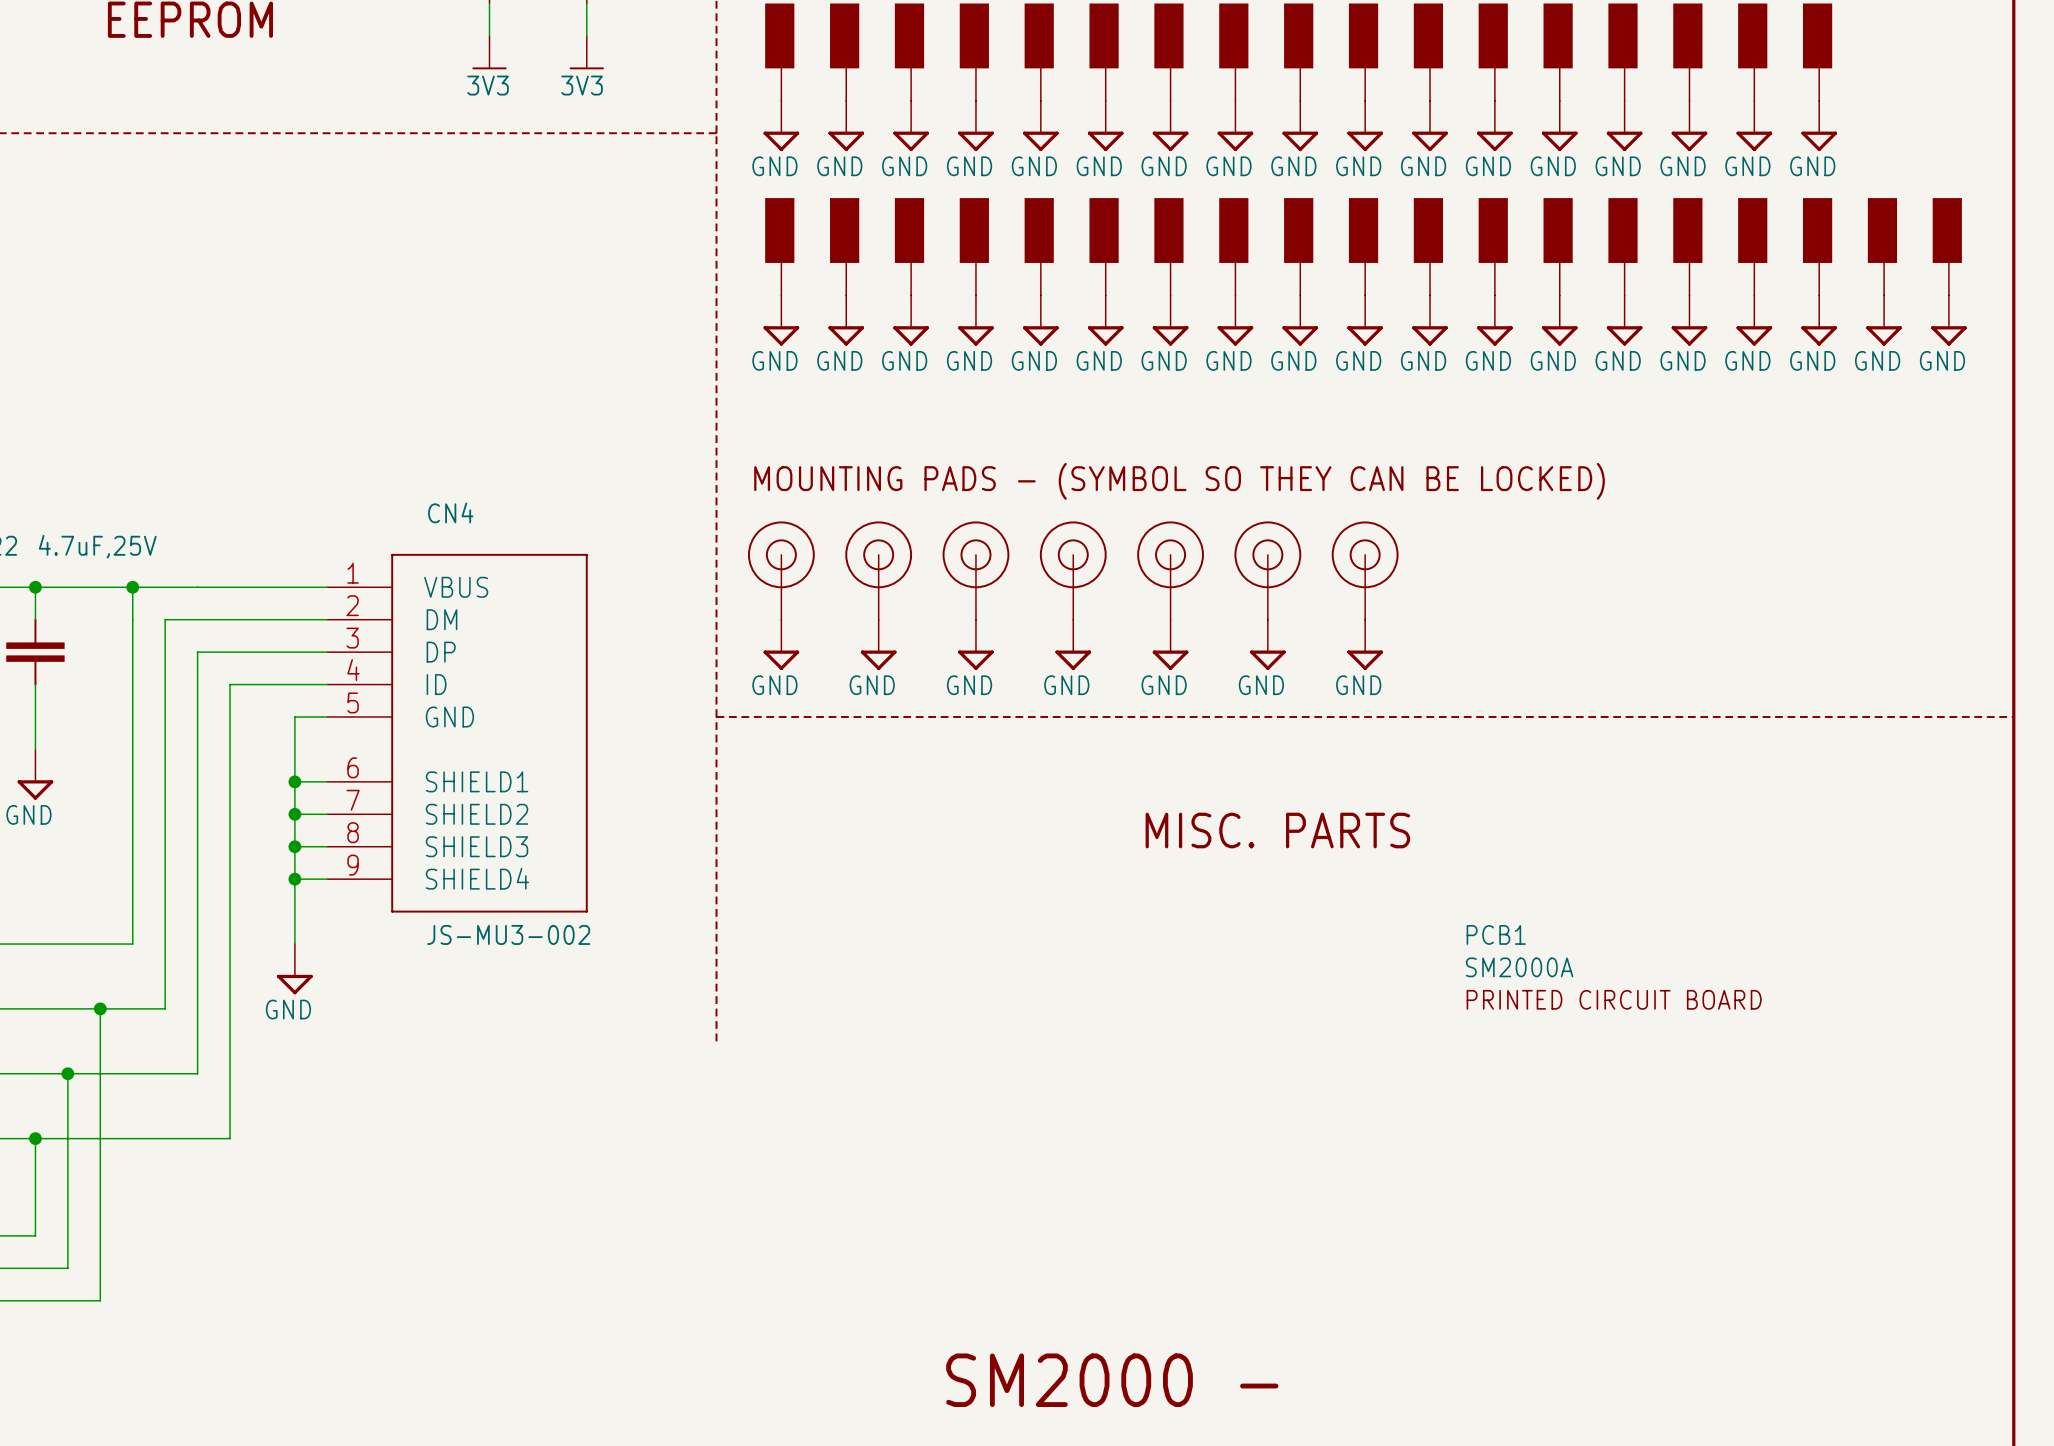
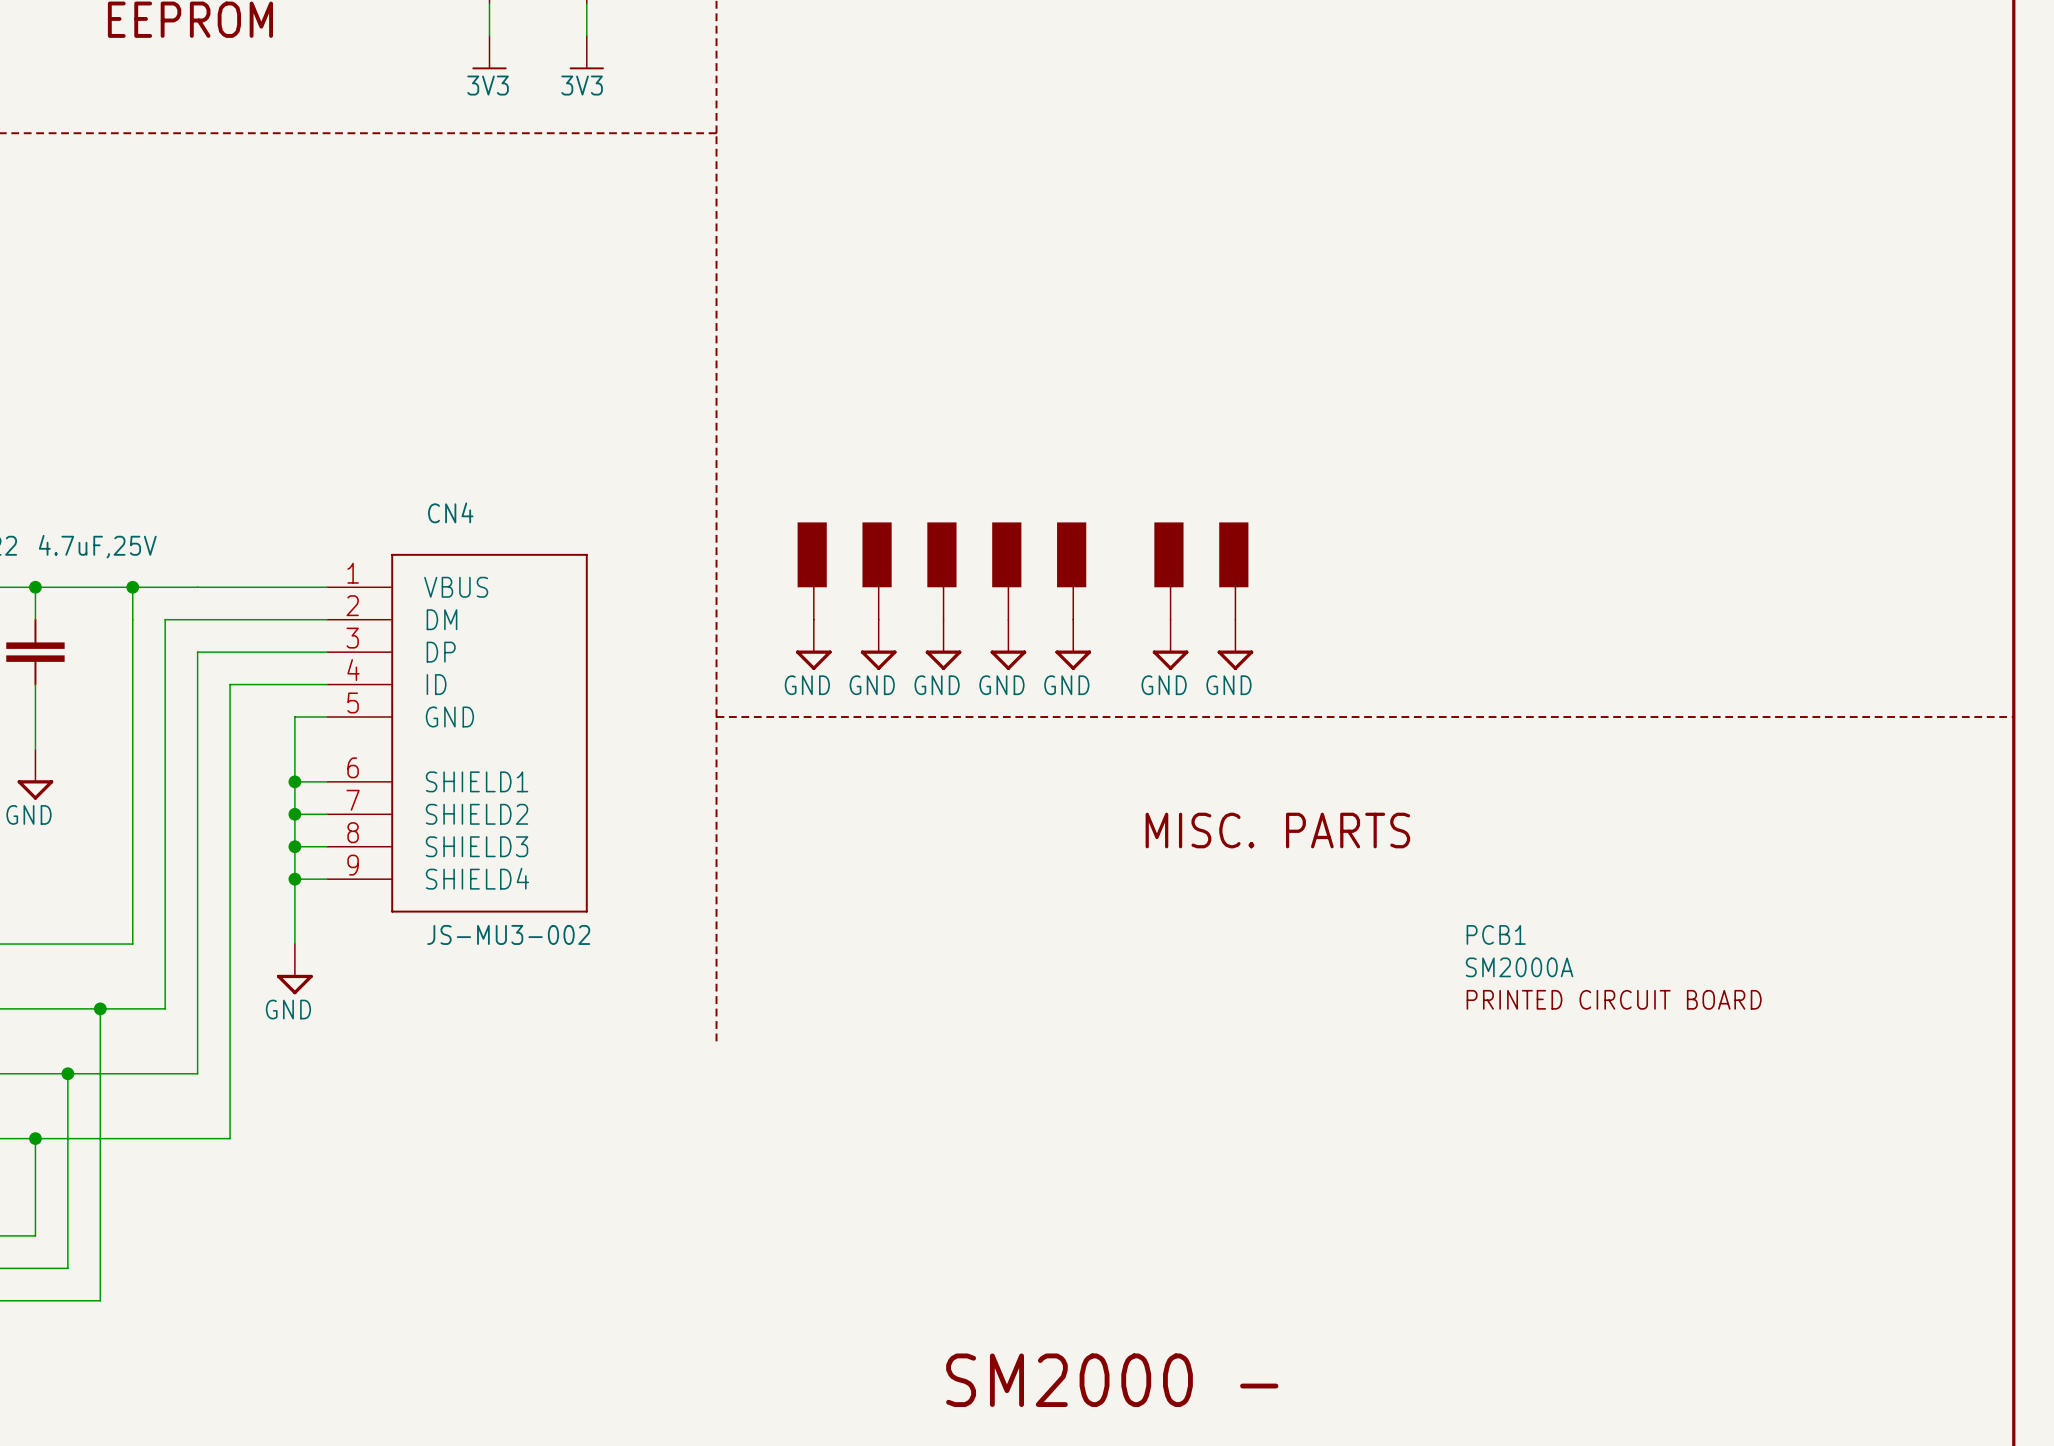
part: (779, 52) -> none
part: (844, 52) -> none
part: (909, 52) -> none
part: (974, 52) -> none
part: (1039, 52) -> none
part: (1104, 52) -> none
part: (1168, 52) -> none
part: (1233, 52) -> none
part: (1298, 52) -> none
part: (1363, 52) -> none
part: (1428, 52) -> none
part: (1493, 52) -> none
part: (1558, 52) -> none
part: (1622, 52) -> none
part: (1687, 52) -> none
part: (1752, 52) -> none
part: (1817, 52) -> none
power symbol: GND (781, 125) -> none
power symbol: GND (846, 125) -> none
power symbol: GND (911, 125) -> none
power symbol: GND (975, 125) -> none
power symbol: GND (1040, 125) -> none
power symbol: GND (1105, 125) -> none
power symbol: GND (1170, 125) -> none
power symbol: GND (1235, 125) -> none
power symbol: GND (1300, 125) -> none
power symbol: GND (1365, 125) -> none
power symbol: GND (1430, 125) -> none
power symbol: GND (1494, 125) -> none
power symbol: GND (1559, 125) -> none
power symbol: GND (1624, 125) -> none
power symbol: GND (1689, 125) -> none
power symbol: GND (1754, 125) -> none
power symbol: GND (1819, 125) -> none
part: (779, 246) -> none
part: (844, 246) -> none
part: (909, 246) -> none
part: (974, 246) -> none
part: (1039, 246) -> none
part: (1104, 246) -> none
part: (1168, 246) -> none
part: (1233, 246) -> none
part: (1298, 246) -> none
part: (1363, 246) -> none
part: (1428, 246) -> none
part: (1493, 246) -> none
part: (1558, 246) -> none
part: (1622, 246) -> none
part: (1687, 246) -> none
part: (1752, 246) -> none
part: (1817, 246) -> none
part: (1882, 246) -> none
part: (1947, 246) -> none
power symbol: GND (781, 320) -> none
power symbol: GND (846, 320) -> none
power symbol: GND (911, 320) -> none
power symbol: GND (975, 320) -> none
power symbol: GND (1040, 320) -> none
power symbol: GND (1105, 320) -> none
power symbol: GND (1170, 320) -> none
power symbol: GND (1235, 320) -> none
power symbol: GND (1300, 320) -> none
power symbol: GND (1365, 320) -> none
power symbol: GND (1430, 320) -> none
power symbol: GND (1494, 320) -> none
power symbol: GND (1559, 320) -> none
power symbol: GND (1624, 320) -> none
power symbol: GND (1689, 320) -> none
power symbol: GND (1754, 320) -> none
power symbol: GND (1819, 320) -> none
power symbol: GND (1884, 320) -> none
power symbol: GND (1948, 320) -> none
text: MOUNTING PADS - (SYMBOL SO THEY CAN BE LOCKED) (1179, 481) -> none
part symbol: [845, 521, 913, 620] -> [862, 522, 892, 620]
part symbol: [1039, 521, 1107, 620] -> [1057, 522, 1087, 620]
part symbol: [1137, 521, 1204, 620] -> [1154, 522, 1184, 620]
part: (781, 570) -> none
part: (975, 570) -> none
part: (1267, 570) -> none
part: (1365, 570) -> none
part: none -> (812, 571)
part: none -> (941, 571)
part: none -> (1006, 571)
part: none -> (1233, 571)
power symbol position: GND (781, 644) -> GND (813, 644)
power symbol: none -> GND (943, 644)
power symbol: GND (975, 644) -> none
power symbol: none -> GND (1008, 644)
power symbol position: GND (1267, 644) -> GND (1235, 644)
power symbol: GND (1365, 644) -> none

